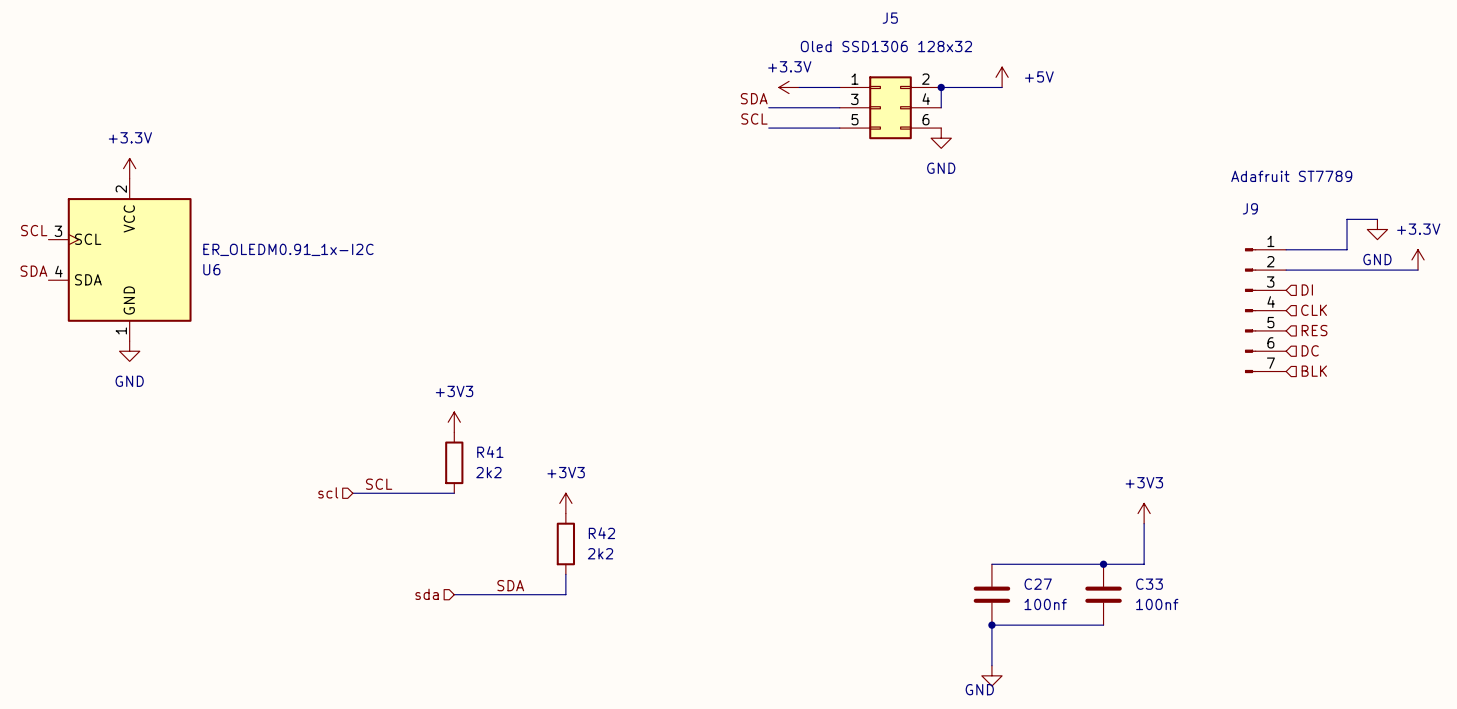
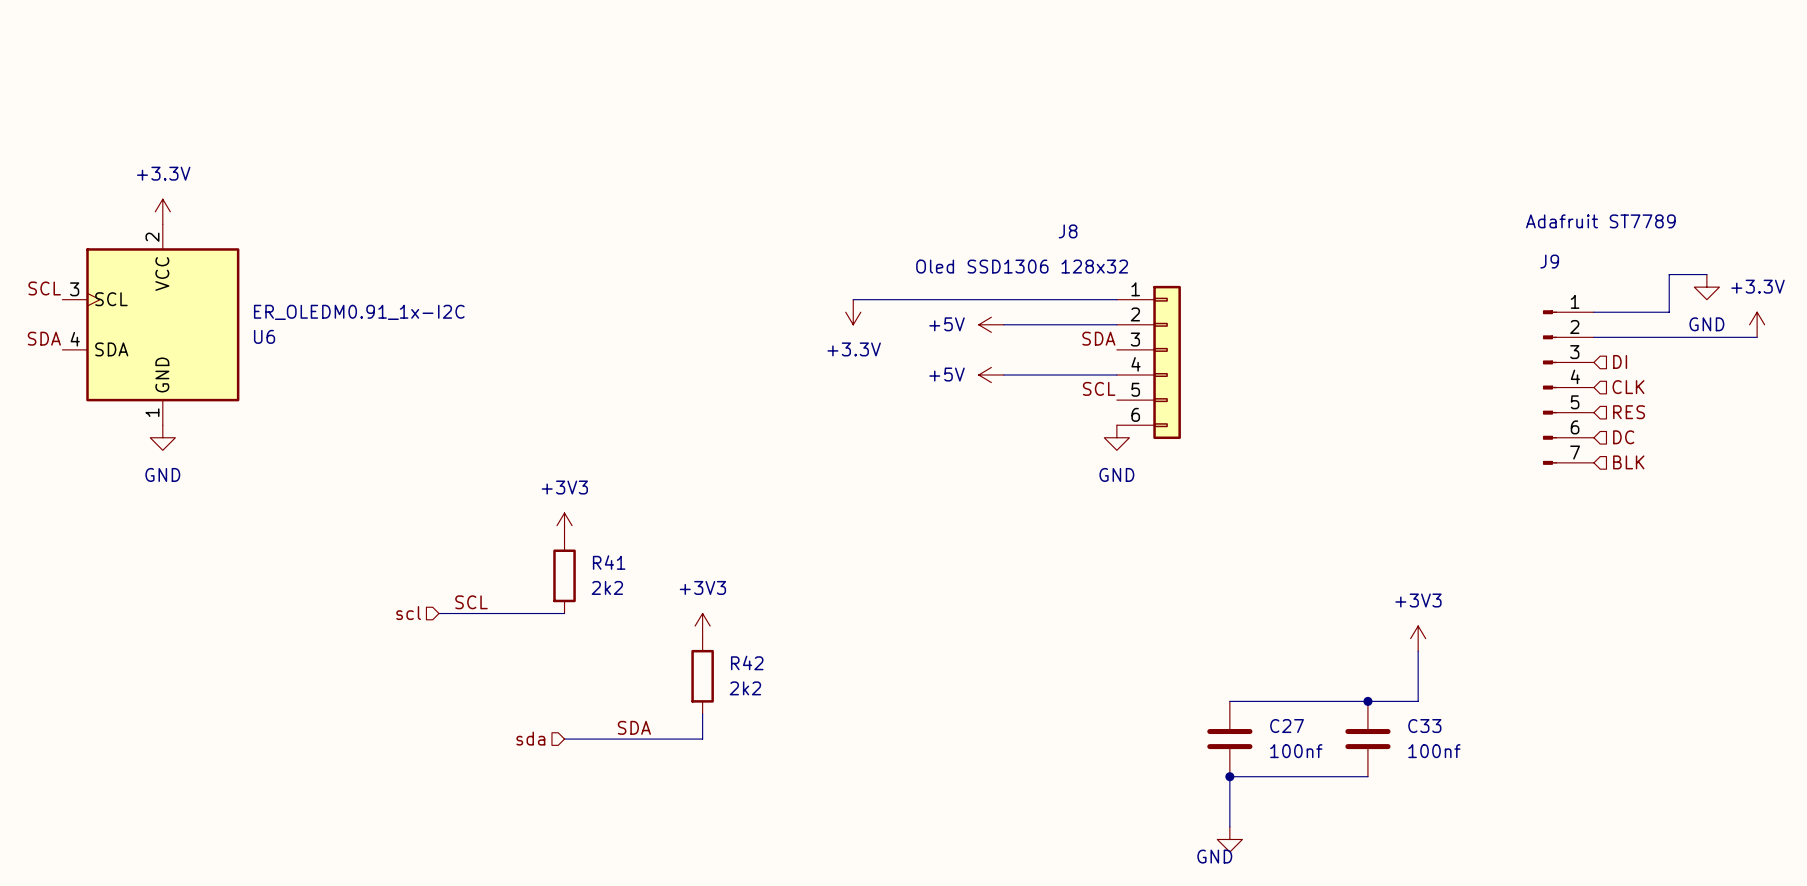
power symbol text position: +3.3V (789, 66) -> +3.3V (854, 349)
power symbol: +5V (1002, 77) -> none
power symbol rotation: 0° (789, 87) -> 90° counterclockwise (853, 312)
power symbol position: +3.3V (789, 87) -> +3.3V (853, 312)
wire: (799, 87) (839, 87) -> none
junction: (941, 87) -> none
wire: (1002, 87) (941, 87) (941, 107) -> none
label: SDA (754, 98) -> none
wire: (768, 107) (839, 107) -> none
J5: Oled SSD1306 128x32 (890, 107) -> none
label: SCL (754, 119) -> none
wire: (768, 128) (839, 128) -> none
power symbol: GND (941, 138) -> none
wire: none -> (853, 299) (1116, 299)
power symbol: none -> +5V (991, 324)
wire: none -> (1003, 324) (1116, 324)
label: none -> SDA (1098, 338)
J8: none -> Oled SSD1306 128x32 (1148, 362)
power symbol: none -> +5V (991, 375)
wire: none -> (1003, 375) (1116, 375)
label: none -> SCL (1099, 388)
power symbol: none -> GND (1116, 437)

